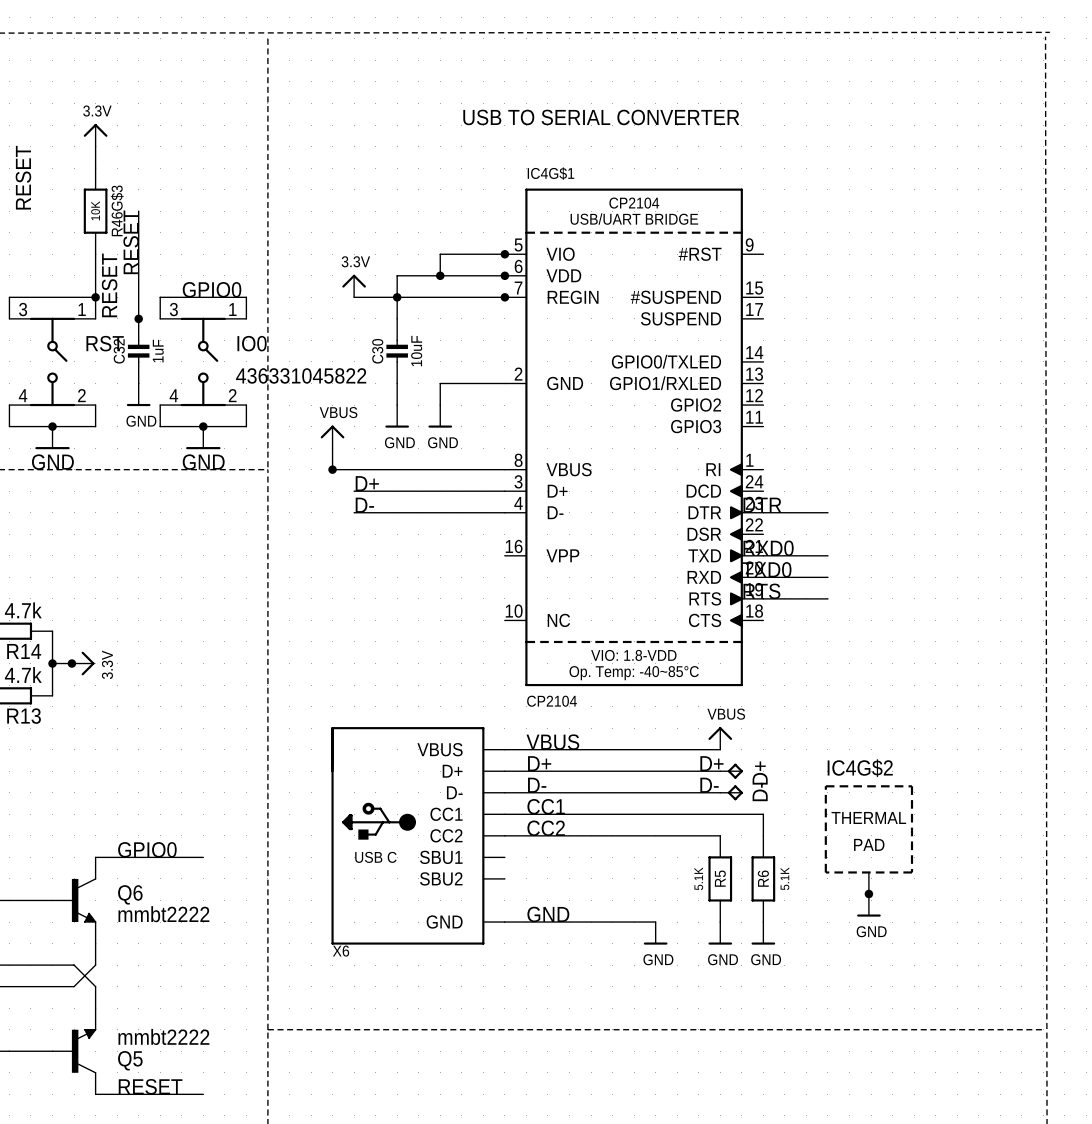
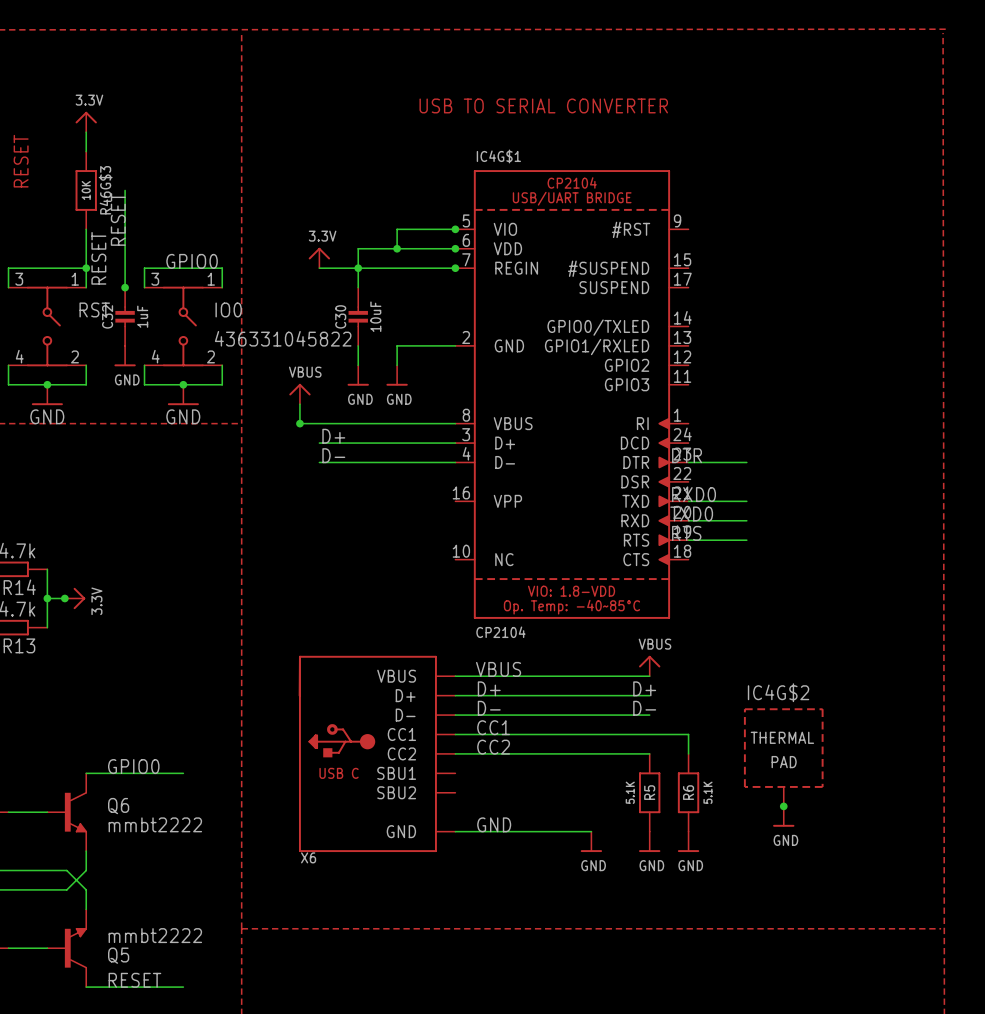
D+: (731, 771) -> none
D-: (731, 792) -> none

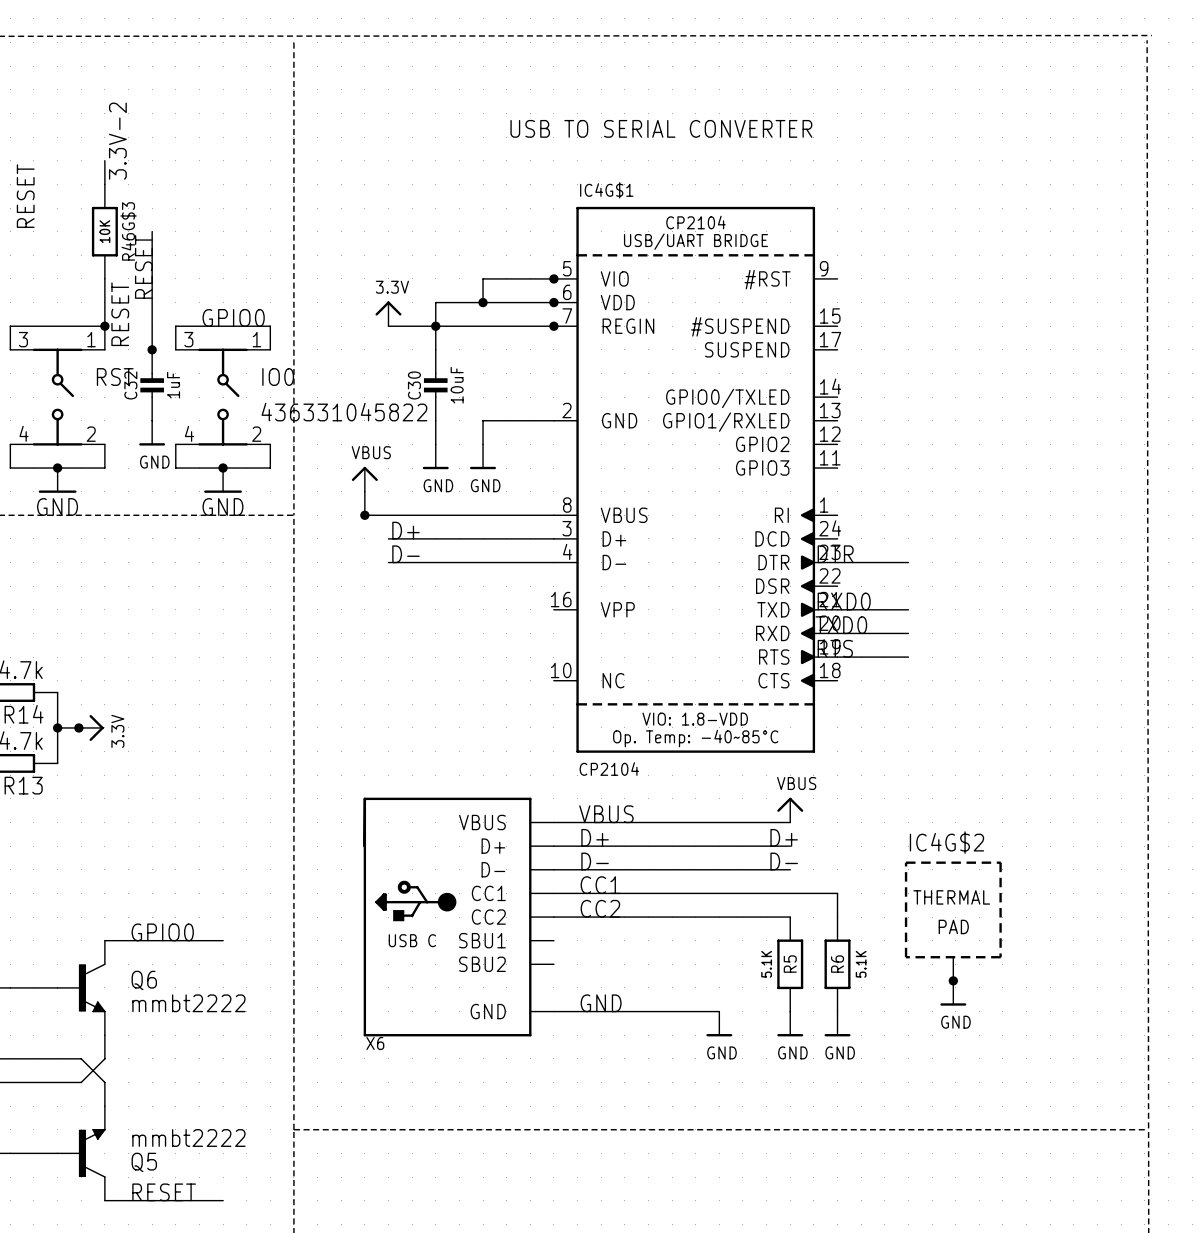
label: none -> 3.3V-2 (117, 141)
power symbol: 3.3V (86, 121) -> none

